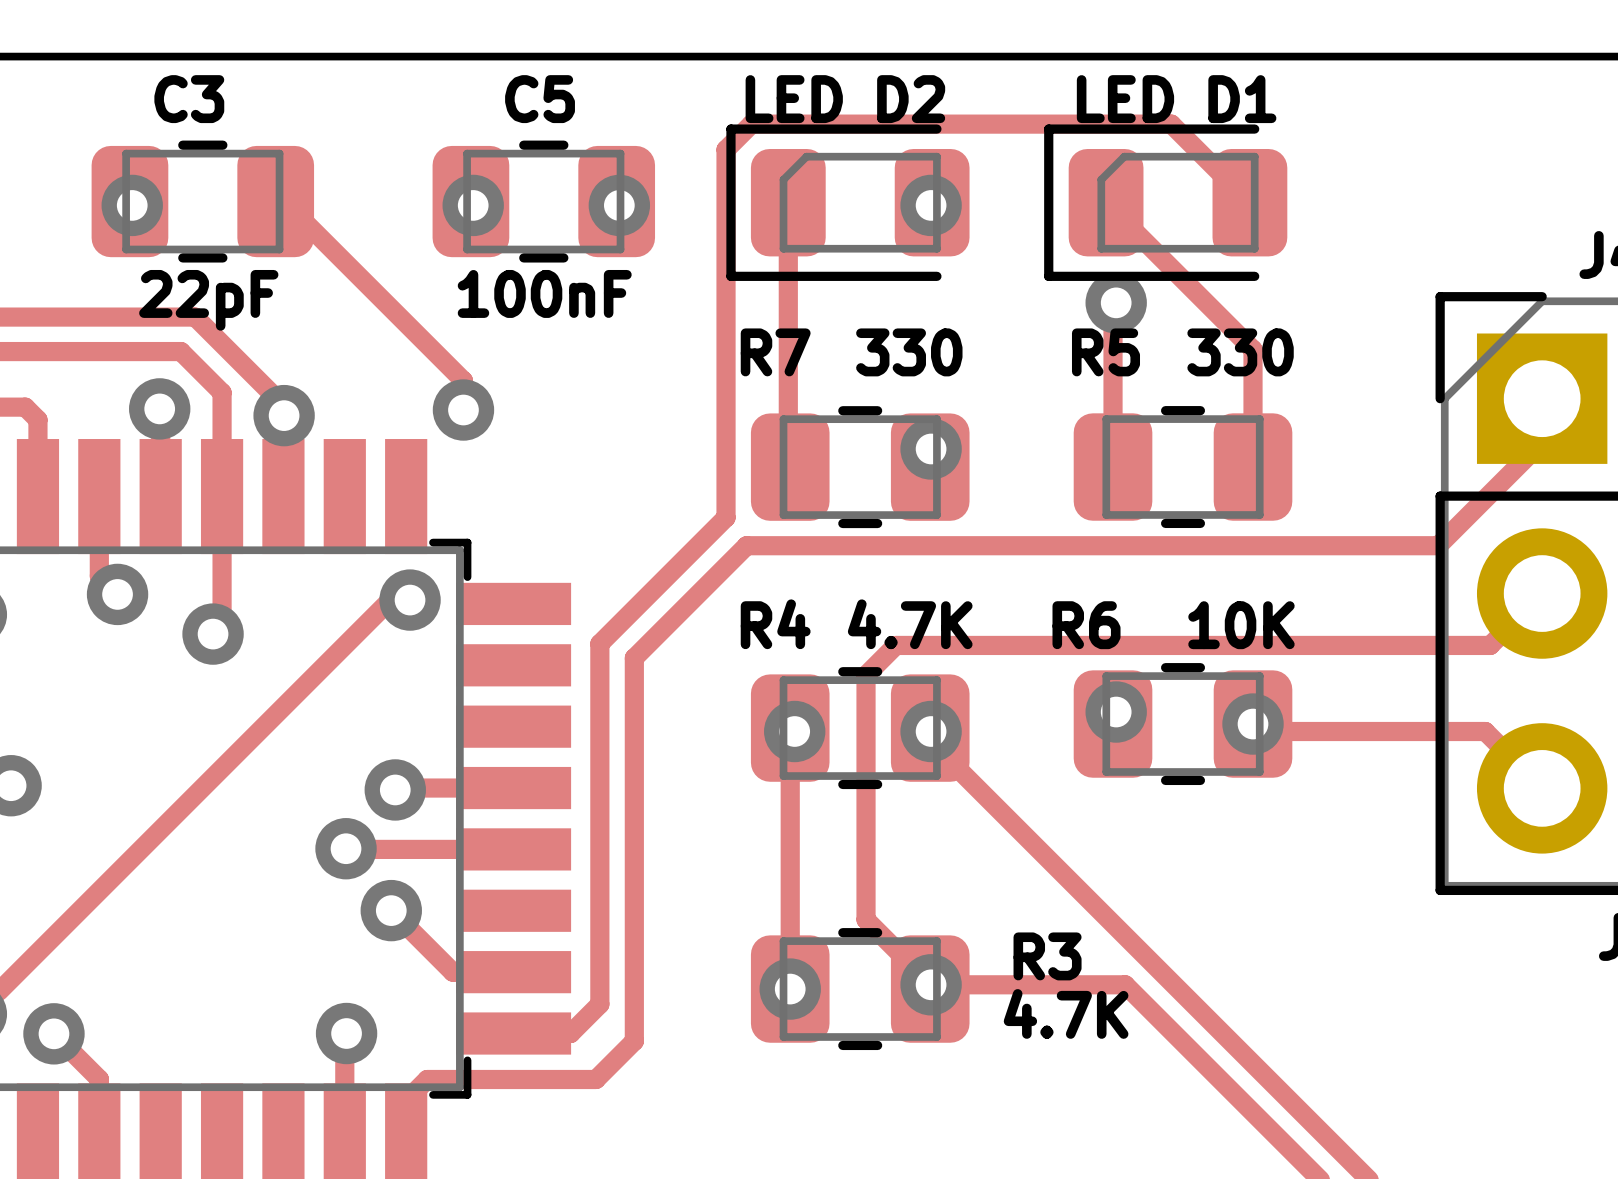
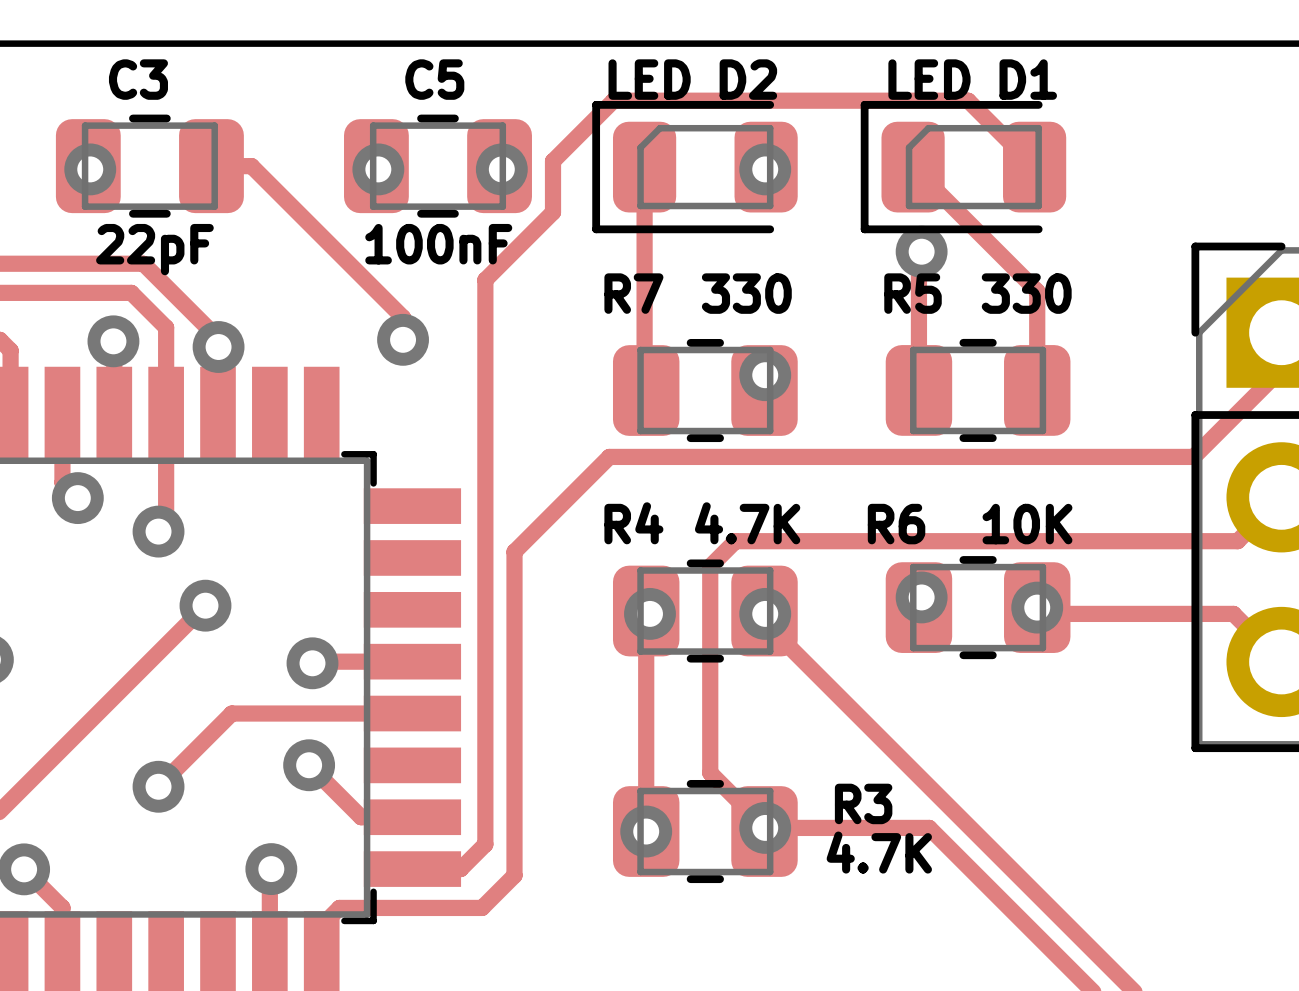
top track: (726, 149) (726, 517) (599, 643) -> (591, 122) (553, 161) (553, 212) (485, 279) (485, 539)
top track: (284, 201) (463, 380) (463, 410) -> (218, 166) (251, 166) (403, 317) (403, 339)
via position: (463, 410) -> (403, 339)
top track: (410, 600) (390, 600) (268, 721) -> none
via: (410, 600) -> none
via: none -> (205, 605)
via: (346, 848) -> none
top track: none -> (271, 713) (231, 713) (158, 786)
via: none -> (158, 786)

